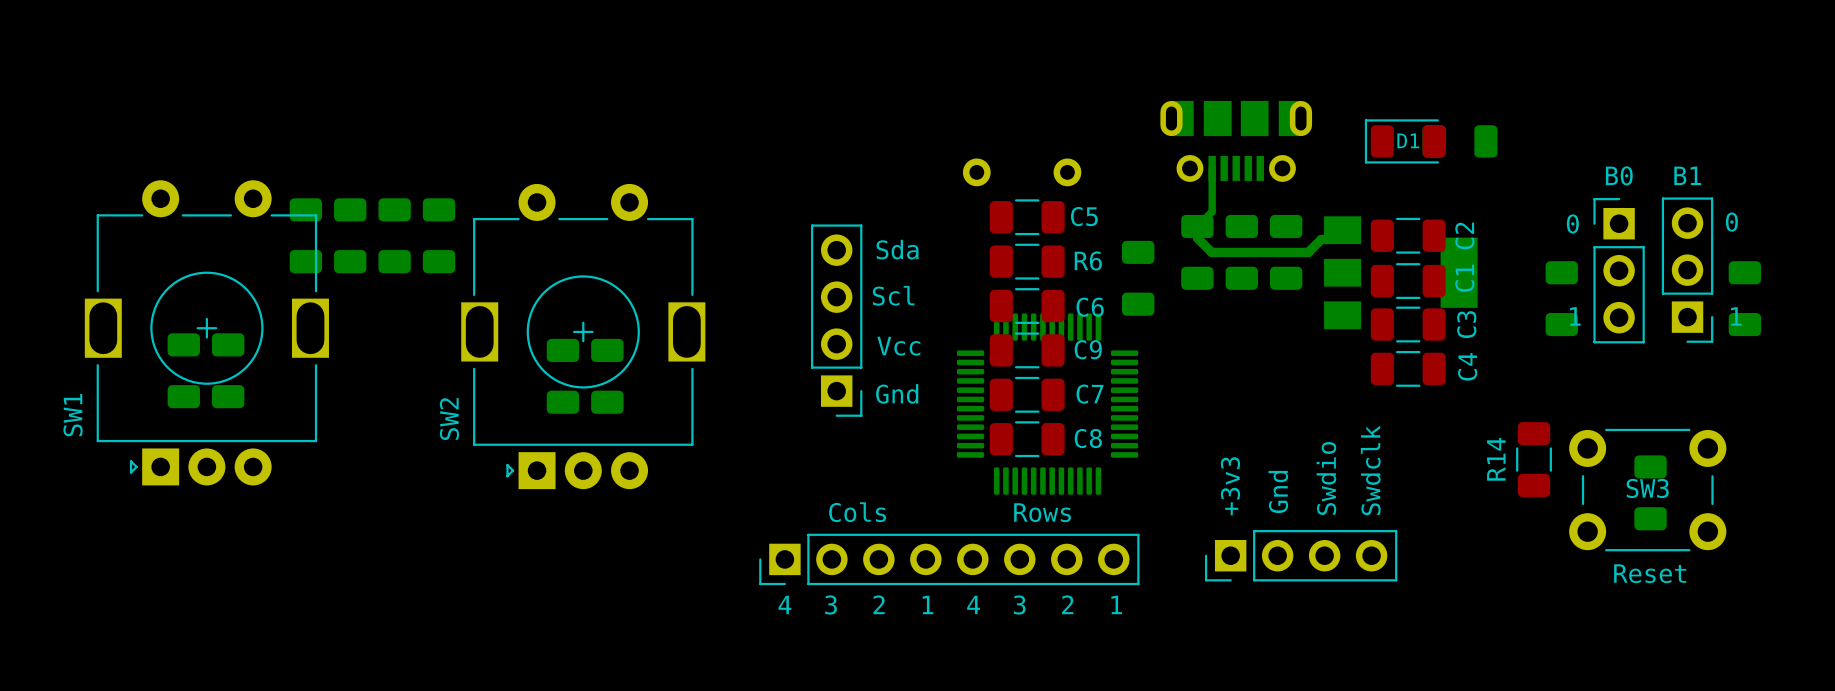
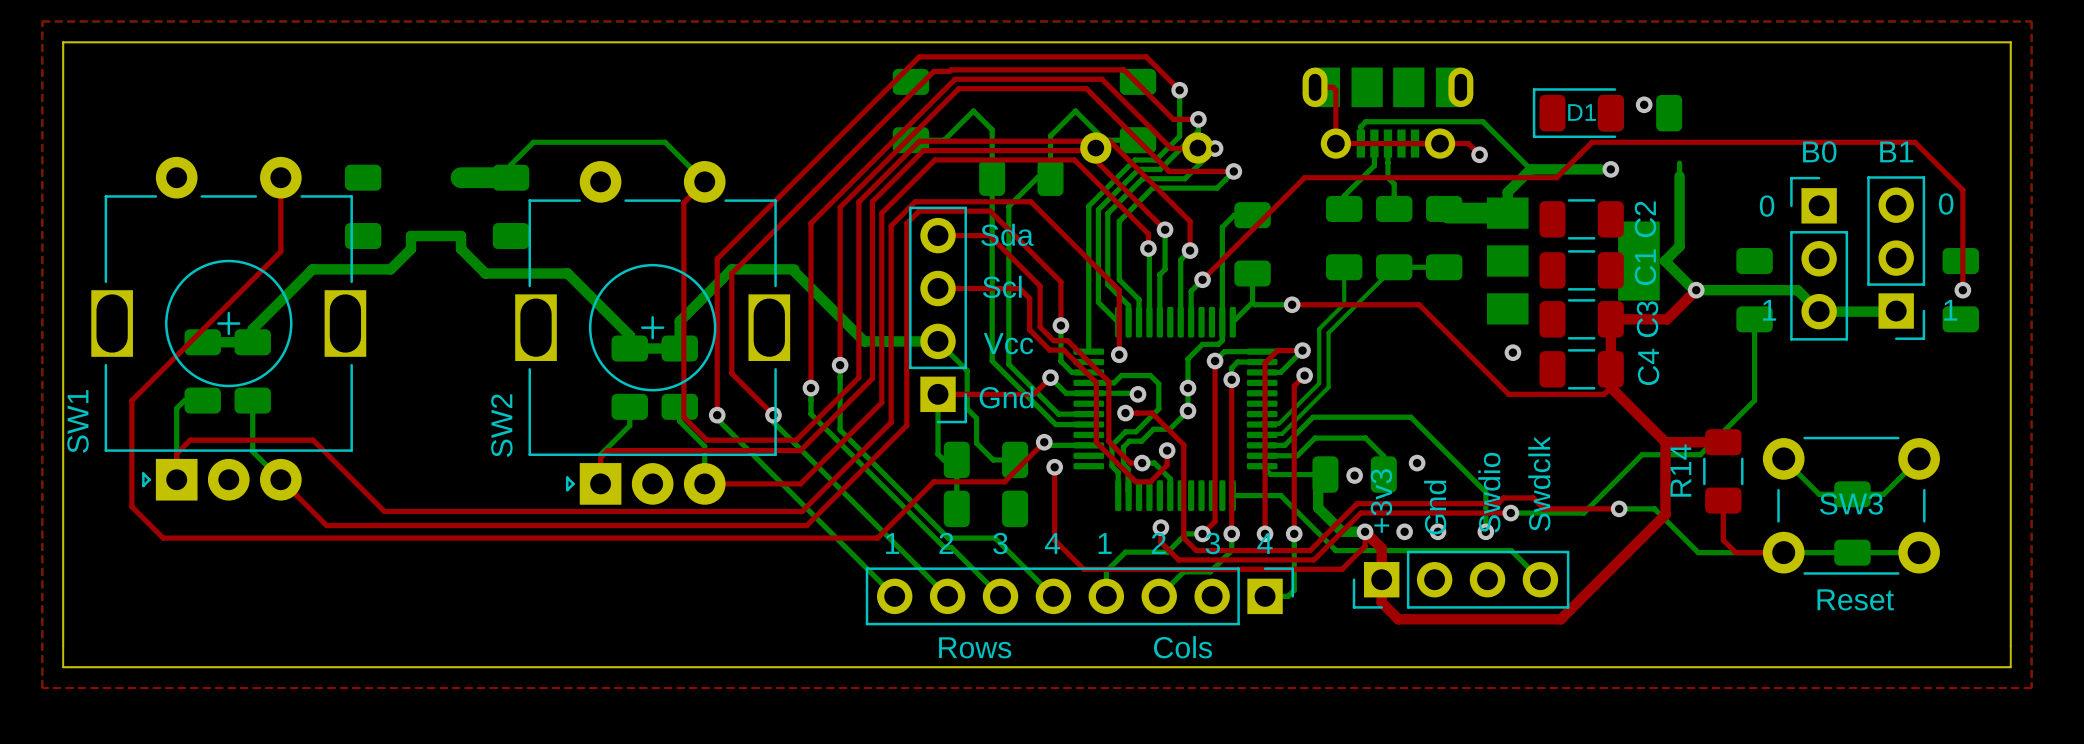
top zone outline: none -> (42, 21) (42, 688) (2031, 688) (2031, 21) (42, 21)
board edge: none -> (63, 42) (2010, 42) (2010, 667) (63, 667) (63, 42)
top track: none -> (1315, 87) (1332, 87) (1335, 90) (1335, 143) (1468, 143) (1479, 154)
bottom track: none -> (1179, 90) (1179, 136) (1155, 159) (1134, 159) (1088, 206) (1088, 351)
top track: none -> (1179, 90) (1146, 56) (919, 56) (717, 258) (717, 415)
via: none -> (1179, 90)
via: none -> (1644, 104)
bottom track: none -> (1198, 119) (1198, 131) (1160, 169) (1138, 169) (1098, 209) (1098, 302) (1118, 322)
top track: none -> (1198, 119) (1173, 119) (1123, 69) (933, 71) (731, 273) (731, 373) (773, 415)
via: none -> (1198, 119)
bottom track: none -> (910, 140) (944, 140) (973, 111) (992, 129) (992, 361) (1055, 424) (1088, 424)
bottom track: none -> (1138, 140) (1104, 140) (1075, 111) (1050, 136) (1050, 177) (1037, 177) (1008, 206) (1008, 364) (1058, 414) (1088, 414)
bottom track: (1212, 168) (1212, 211) (1197, 226) (1197, 238) (1211, 252) (1308, 252) (1321, 239) (1333, 239) -> (1360, 143) (1360, 126) (1365, 121) (1482, 121) (1530, 169)
bottom track: none -> (1374, 143) (1374, 165) (1344, 195) (1344, 208)
bottom track: none -> (1387, 143) (1387, 177) (1394, 183) (1394, 208)
bottom track: none -> (1215, 148) (1184, 178) (1142, 178) (1107, 213) (1107, 284) (1128, 305) (1128, 322)
top track: none -> (1215, 148) (1171, 148) (1102, 79) (955, 79) (810, 223) (810, 388)
via: none -> (1215, 148)
via: none -> (1479, 154)
bottom track: none -> (1679, 163) (1679, 246) (1664, 261) (1694, 290) (1797, 290) (1819, 311) (1896, 311)
bottom track: none -> (1530, 169) (1612, 169)
bottom track: none -> (1530, 169) (1507, 192) (1507, 213) (1448, 213) (1444, 208)
via: none -> (1610, 169)
bottom track: none -> (1233, 171) (1217, 188) (1152, 188) (1119, 221) (1119, 279) (1139, 299) (1139, 322)
top track: none -> (1233, 171) (1169, 171) (1086, 88) (958, 88) (840, 207) (840, 365)
via: none -> (1233, 171)
top track: none -> (280, 177) (280, 251) (131, 400) (131, 506) (163, 538) (877, 538) (933, 481) (1004, 481) (1044, 442)
bottom track: none -> (461, 177) (511, 177) (511, 164) (533, 142) (665, 142) (704, 181)
top track: none -> (704, 181) (683, 202) (683, 417) (706, 440) (796, 440) (858, 377) (858, 201) (919, 141) (1109, 141) (1190, 221) (1190, 250)
C5 side: top (1027, 217) -> bottom (910, 111)
part: none -> (363, 206)
bottom track: none -> (1252, 215) (1234, 215) (1222, 227) (1222, 340) (1218, 344) (1202, 344) (1187, 358) (1187, 410) (1169, 429) (1153, 429) (1141, 441) (1129, 441) (1123, 447) (1123, 464) (1128, 469) (1128, 495)
part: (305, 235) -> none
part: (350, 235) -> none
part: (394, 235) -> none
part position: (439, 235) -> (511, 206)
bottom track: none -> (1165, 229) (1165, 269) (1159, 274) (1159, 322)
top track: none -> (1165, 229) (1085, 150) (923, 150) (872, 201) (872, 378) (800, 450) (607, 450) (600, 457) (600, 483)
via: none -> (1165, 229)
top track: none -> (938, 235) (989, 235) (1040, 286) (1040, 327) (1053, 340) (1067, 340) (1108, 381) (1108, 441) (1130, 463) (1142, 463)
bottom track: none -> (1148, 248) (1149, 322)
top track: none -> (1148, 248) (1148, 233) (1074, 159) (934, 159) (881, 213) (881, 402) (800, 483) (704, 483)
via: none -> (1148, 248)
R6 side: top (1027, 261) -> bottom (1021, 177)
bottom track: none -> (1190, 250) (1180, 259) (1180, 322)
via: none -> (1190, 250)
part position: (1138, 278) -> (1252, 244)
bottom track: none -> (1344, 267) (1344, 304) (1319, 329) (1319, 383) (1279, 423) (1262, 424)
bottom track: none -> (1444, 267) (1394, 267) (1328, 332) (1328, 387) (1282, 433) (1262, 434)
bottom track: none -> (1252, 273) (1252, 302) (1254, 304) (1292, 304)
bottom track: none -> (1202, 279) (1191, 291) (1191, 322)
top track: none -> (1202, 279) (1304, 177) (1556, 177) (1592, 142) (1914, 142) (1962, 190) (1962, 286)
via: none -> (1202, 279)
top track: none -> (938, 288) (1019, 288) (1029, 298) (1029, 329) (1049, 350) (1063, 350) (1096, 382) (1096, 442) (1135, 481) (1150, 481) (1167, 465) (1167, 450)
top track: none -> (1696, 290) (1667, 319) (1610, 319) (1610, 387)
via: none -> (1696, 290)
via: none -> (1962, 290)
C6 side: top (1027, 306) -> bottom (1138, 111)
bottom track: none -> (1252, 302) (1232, 322)
top track: none -> (1292, 304) (1419, 304) (1508, 394) (1604, 394) (1610, 387)
via: none -> (1292, 304)
bottom track: none -> (1754, 319) (1754, 400) (1700, 454) (1642, 454) (1583, 513) (1510, 513)
top track: none -> (1060, 325) (1060, 281) (990, 211) (919, 211) (906, 223) (906, 425) (806, 525) (326, 525) (280, 479)
via: none -> (1060, 325)
bottom track: none -> (1060, 331) (1060, 361) (1072, 372) (1088, 372)
bottom track: none -> (202, 342) (252, 342) (252, 329) (312, 269) (390, 269) (411, 249) (411, 236) (461, 236) (461, 249) (485, 273) (567, 273) (629, 335) (629, 348) (679, 348) (679, 321) (731, 269) (794, 269) (864, 341) (938, 341) (967, 370) (967, 408) (976, 418) (976, 443) (993, 459) (1015, 459)
C9 side: top (1027, 350) -> bottom (985, 508)
bottom track: none -> (1302, 350) (1280, 372) (1262, 372)
top track: none -> (1302, 350) (1277, 350) (1265, 363) (1265, 533)
via: none -> (1302, 350)
bottom track: none -> (1262, 351) (1224, 351) (1215, 361)
via: none -> (1512, 352)
top track: none -> (1119, 354) (1119, 290) (1030, 201) (915, 201) (891, 225) (891, 422) (802, 511) (384, 511) (313, 440) (190, 440) (176, 453) (176, 479)
via: none -> (1119, 354)
top track: none -> (1215, 361) (1215, 521) (1202, 533)
via: none -> (1215, 361)
bottom track: none -> (1262, 362) (1237, 362) (1231, 367) (1231, 379)
bottom track: none -> (840, 365) (840, 430) (948, 538) (995, 538) (1053, 596)
via: none -> (840, 365)
top track: none -> (1304, 375) (1294, 386) (1294, 533)
via: none -> (1304, 375)
bottom track: none -> (1050, 377) (1066, 393) (1138, 394)
top track: none -> (1050, 377) (1033, 394) (938, 394)
via: none -> (1050, 377)
top track: none -> (1231, 379) (1231, 533)
via: none -> (1231, 379)
bottom track: none -> (1088, 382) (1114, 382) (1121, 375) (1150, 375) (1158, 383) (1158, 408) (1135, 431) (1125, 431) (1111, 445) (1111, 466) (1118, 472) (1118, 495)
bottom track: none -> (810, 388) (810, 414) (944, 547) (951, 547) (1000, 596)
via: none -> (810, 388)
via: none -> (1187, 388)
top track: none -> (1610, 387) (1665, 442)
bottom track: none -> (938, 394) (938, 454) (943, 459) (956, 459) (956, 508)
via: none -> (1138, 394)
C7 side: top (1027, 394) -> bottom (1354, 474)
bottom track: none -> (202, 400) (184, 400) (176, 408) (176, 479)
bottom track: none -> (252, 400) (252, 451) (280, 479)
bottom track: none -> (629, 406) (629, 425) (600, 454) (600, 483)
bottom track: none -> (679, 406) (679, 421) (704, 446) (704, 483)
via: none -> (1187, 410)
top track: none -> (1125, 413) (1152, 413) (1183, 444) (1183, 538) (1196, 550) (1310, 550) (1356, 503) (1497, 503) (1503, 497) (1533, 497) (1544, 508)
via: none -> (1125, 413)
bottom track: none -> (717, 415) (717, 418) (894, 596)
via: none -> (717, 415)
bottom track: none -> (773, 415) (773, 422) (947, 596)
via: none -> (773, 415)
bottom track: none -> (1044, 442) (1047, 445) (1088, 445)
via: none -> (1044, 442)
top track: none -> (1665, 442) (1723, 442)
top track: none -> (1665, 442) (1665, 514) (1560, 619) (1398, 619) (1381, 602) (1381, 548) (1365, 531) (1365, 546) (1342, 569) (1083, 569) (1054, 540) (1054, 467)
bottom track: none -> (1262, 445) (1284, 445) (1312, 417) (1410, 417) (1485, 492) (1485, 531)
C8 side: top (1027, 439) -> bottom (985, 459)
via: none -> (1167, 450)
bottom track: none -> (1262, 455) (1297, 455) (1315, 438) (1365, 438) (1383, 456) (1383, 474)
bottom track: none -> (1783, 458) (1819, 494) (1883, 494) (1919, 458)
bottom track: none -> (1142, 463) (1154, 463) (1170, 478) (1170, 495)
via: none -> (1142, 463)
via: none -> (1417, 463)
bottom track: none -> (1262, 466) (1270, 474) (1318, 474)
via: none -> (1054, 467)
bottom track: none -> (1318, 474) (1318, 507) (1342, 531) (1365, 531)
via: none -> (1354, 475)
bottom track: none -> (1232, 495) (1280, 495) (1335, 550) (1511, 550) (1540, 579)
top track: none -> (1723, 500) (1723, 540) (1735, 552) (1783, 552)
top track: none -> (1542, 508) (1619, 508)
bottom track: none -> (1619, 508) (1654, 508) (1698, 552) (1919, 552)
via: none -> (1619, 508)
part position: (1650, 492) -> (1852, 523)
top track: none -> (1510, 513) (1360, 513) (1314, 559) (1178, 559) (1160, 542) (1160, 527)
via: none -> (1510, 513)
via: none -> (1160, 527)
via: none -> (1365, 531)
via: none -> (1404, 531)
via: none -> (1437, 531)
via: none -> (1485, 531)
bottom track: none -> (1202, 533) (1185, 533) (1167, 552) (1125, 552) (1106, 571) (1106, 596)
via: none -> (1202, 533)
bottom track: none -> (1231, 533) (1231, 550) (1210, 571) (1183, 571) (1159, 596)
via: none -> (1231, 533)
via: none -> (1265, 533)
bottom track: none -> (1294, 533) (1294, 590) (1287, 596) (1265, 596)
via: none -> (1294, 533)
part rotation: 0° (949, 559) -> 180° (1079, 596)

